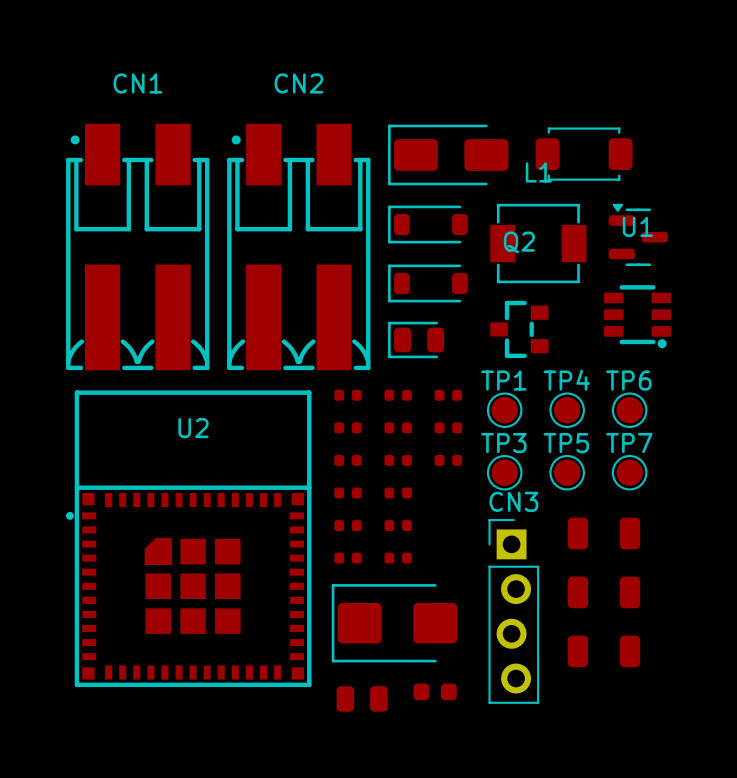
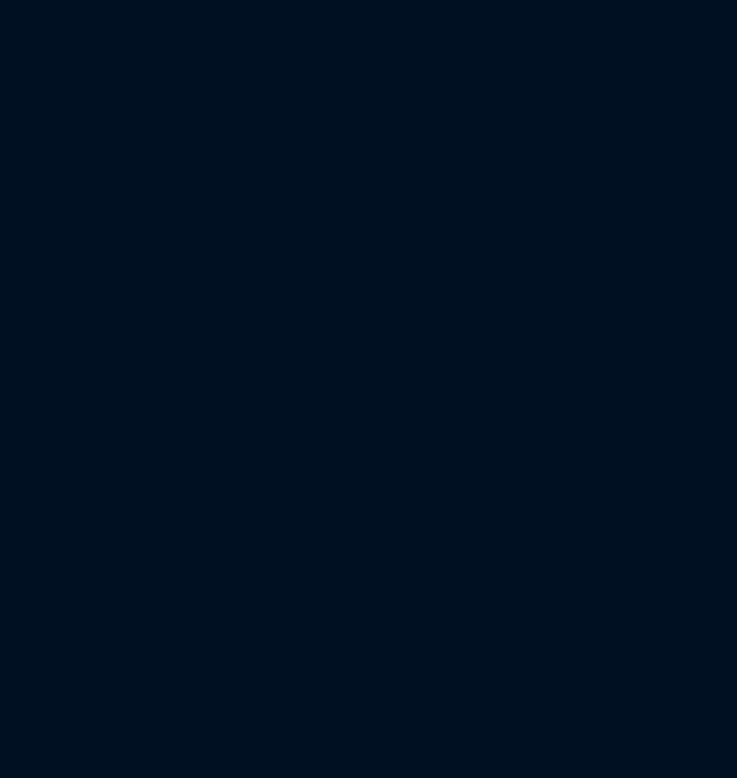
part: (448, 154) -> none
part: (584, 154) -> none
part: (427, 224) -> none
part: (638, 234) -> none
L1: (538, 243) -> none
CN1: (137, 246) -> none
CN2: (298, 246) -> none
part: (427, 283) -> none
U1: (637, 316) -> none
Q2: (519, 329) -> none
part: (416, 339) -> none
part: (348, 395) -> none
part: (398, 395) -> none
part: (448, 395) -> none
TP1: (504, 410) -> none
TP4: (567, 410) -> none
TP6: (629, 410) -> none
part: (348, 427) -> none
part: (398, 427) -> none
part: (448, 427) -> none
part: (348, 460) -> none
part: (398, 460) -> none
part: (448, 460) -> none
TP3: (504, 472) -> none
TP5: (567, 472) -> none
TP7: (629, 472) -> none
part: (348, 492) -> none
part: (398, 492) -> none
part: (348, 525) -> none
part: (398, 525) -> none
part: (603, 533) -> none
U2: (188, 538) -> none
part: (348, 558) -> none
part: (398, 558) -> none
part: (603, 592) -> none
CN3: (513, 611) -> none
part: (394, 623) -> none
part: (603, 651) -> none
part: (435, 691) -> none
part: (362, 698) -> none

